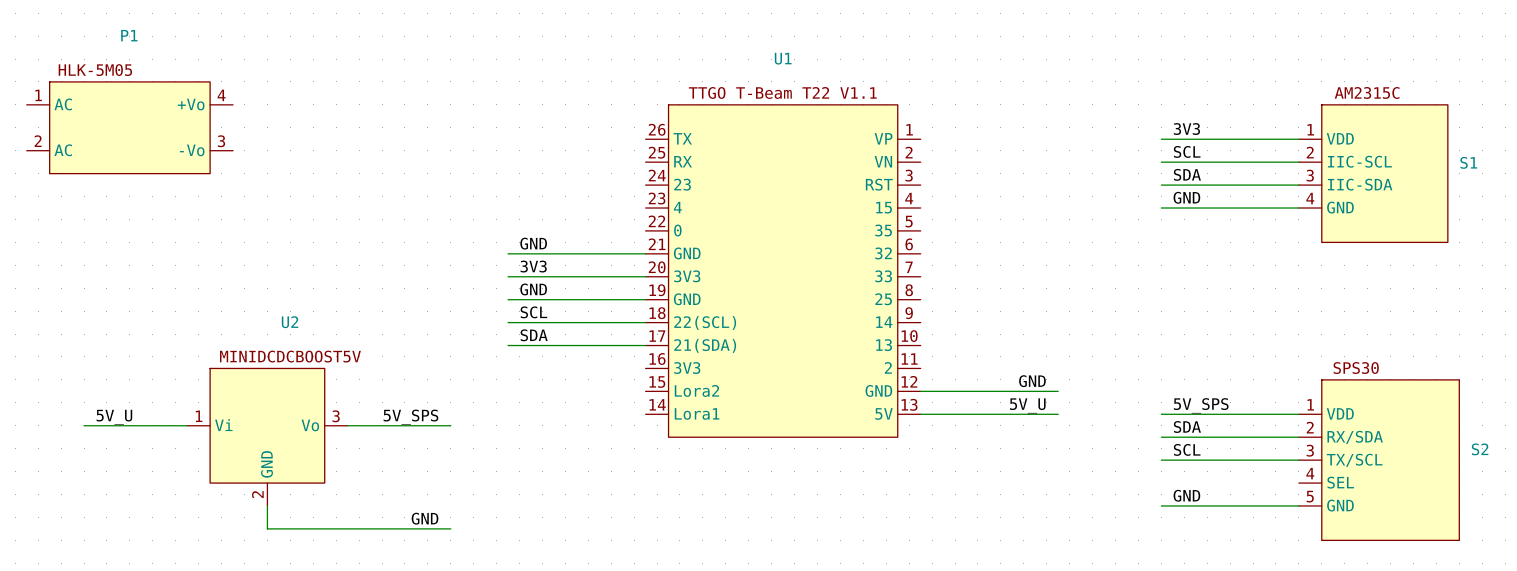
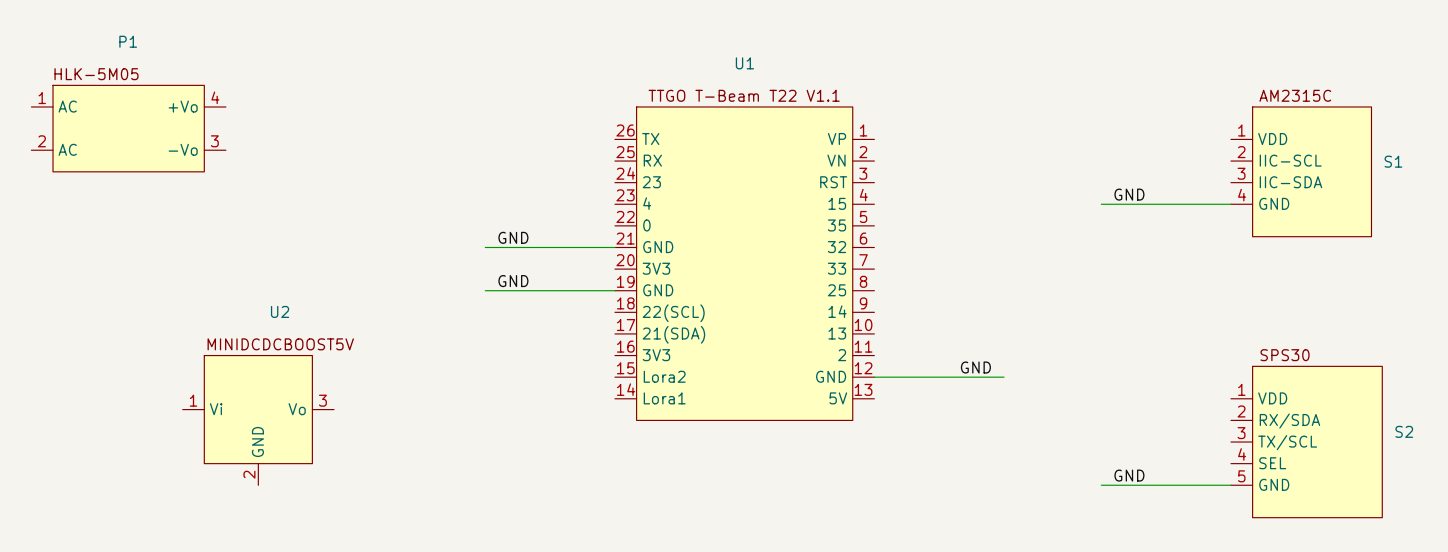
label: 3V3 (1186, 129) -> none
wire: (1161, 139) (1298, 139) -> none
label: SCL (1187, 151) -> none
wire: (1161, 162) (1298, 162) -> none
label: SDA (1187, 174) -> none
wire: (1161, 185) (1298, 185) -> none
label: 3V3 (533, 266) -> none
wire: (508, 276) (645, 276) -> none
label: SCL (533, 312) -> none
wire: (508, 322) (645, 322) -> none
label: SDA (534, 335) -> none
wire: (508, 345) (645, 345) -> none
label: 5V_U (1027, 405) -> none
label: 5V_SPS (1201, 405) -> none
wire: (920, 414) (1058, 414) -> none
wire: (1161, 414) (1298, 414) -> none
label: 5V_U (114, 417) -> none
label: 5V_SPS (410, 417) -> none
wire: (84, 425) (187, 425) -> none
wire: (347, 425) (450, 425) -> none
label: SDA (1187, 426) -> none
wire: (1161, 437) (1298, 437) -> none
label: SCL (1187, 449) -> none
wire: (1161, 460) (1298, 460) -> none
wire: (267, 505) (267, 528) (450, 528) -> none
label: GND (425, 518) -> none

